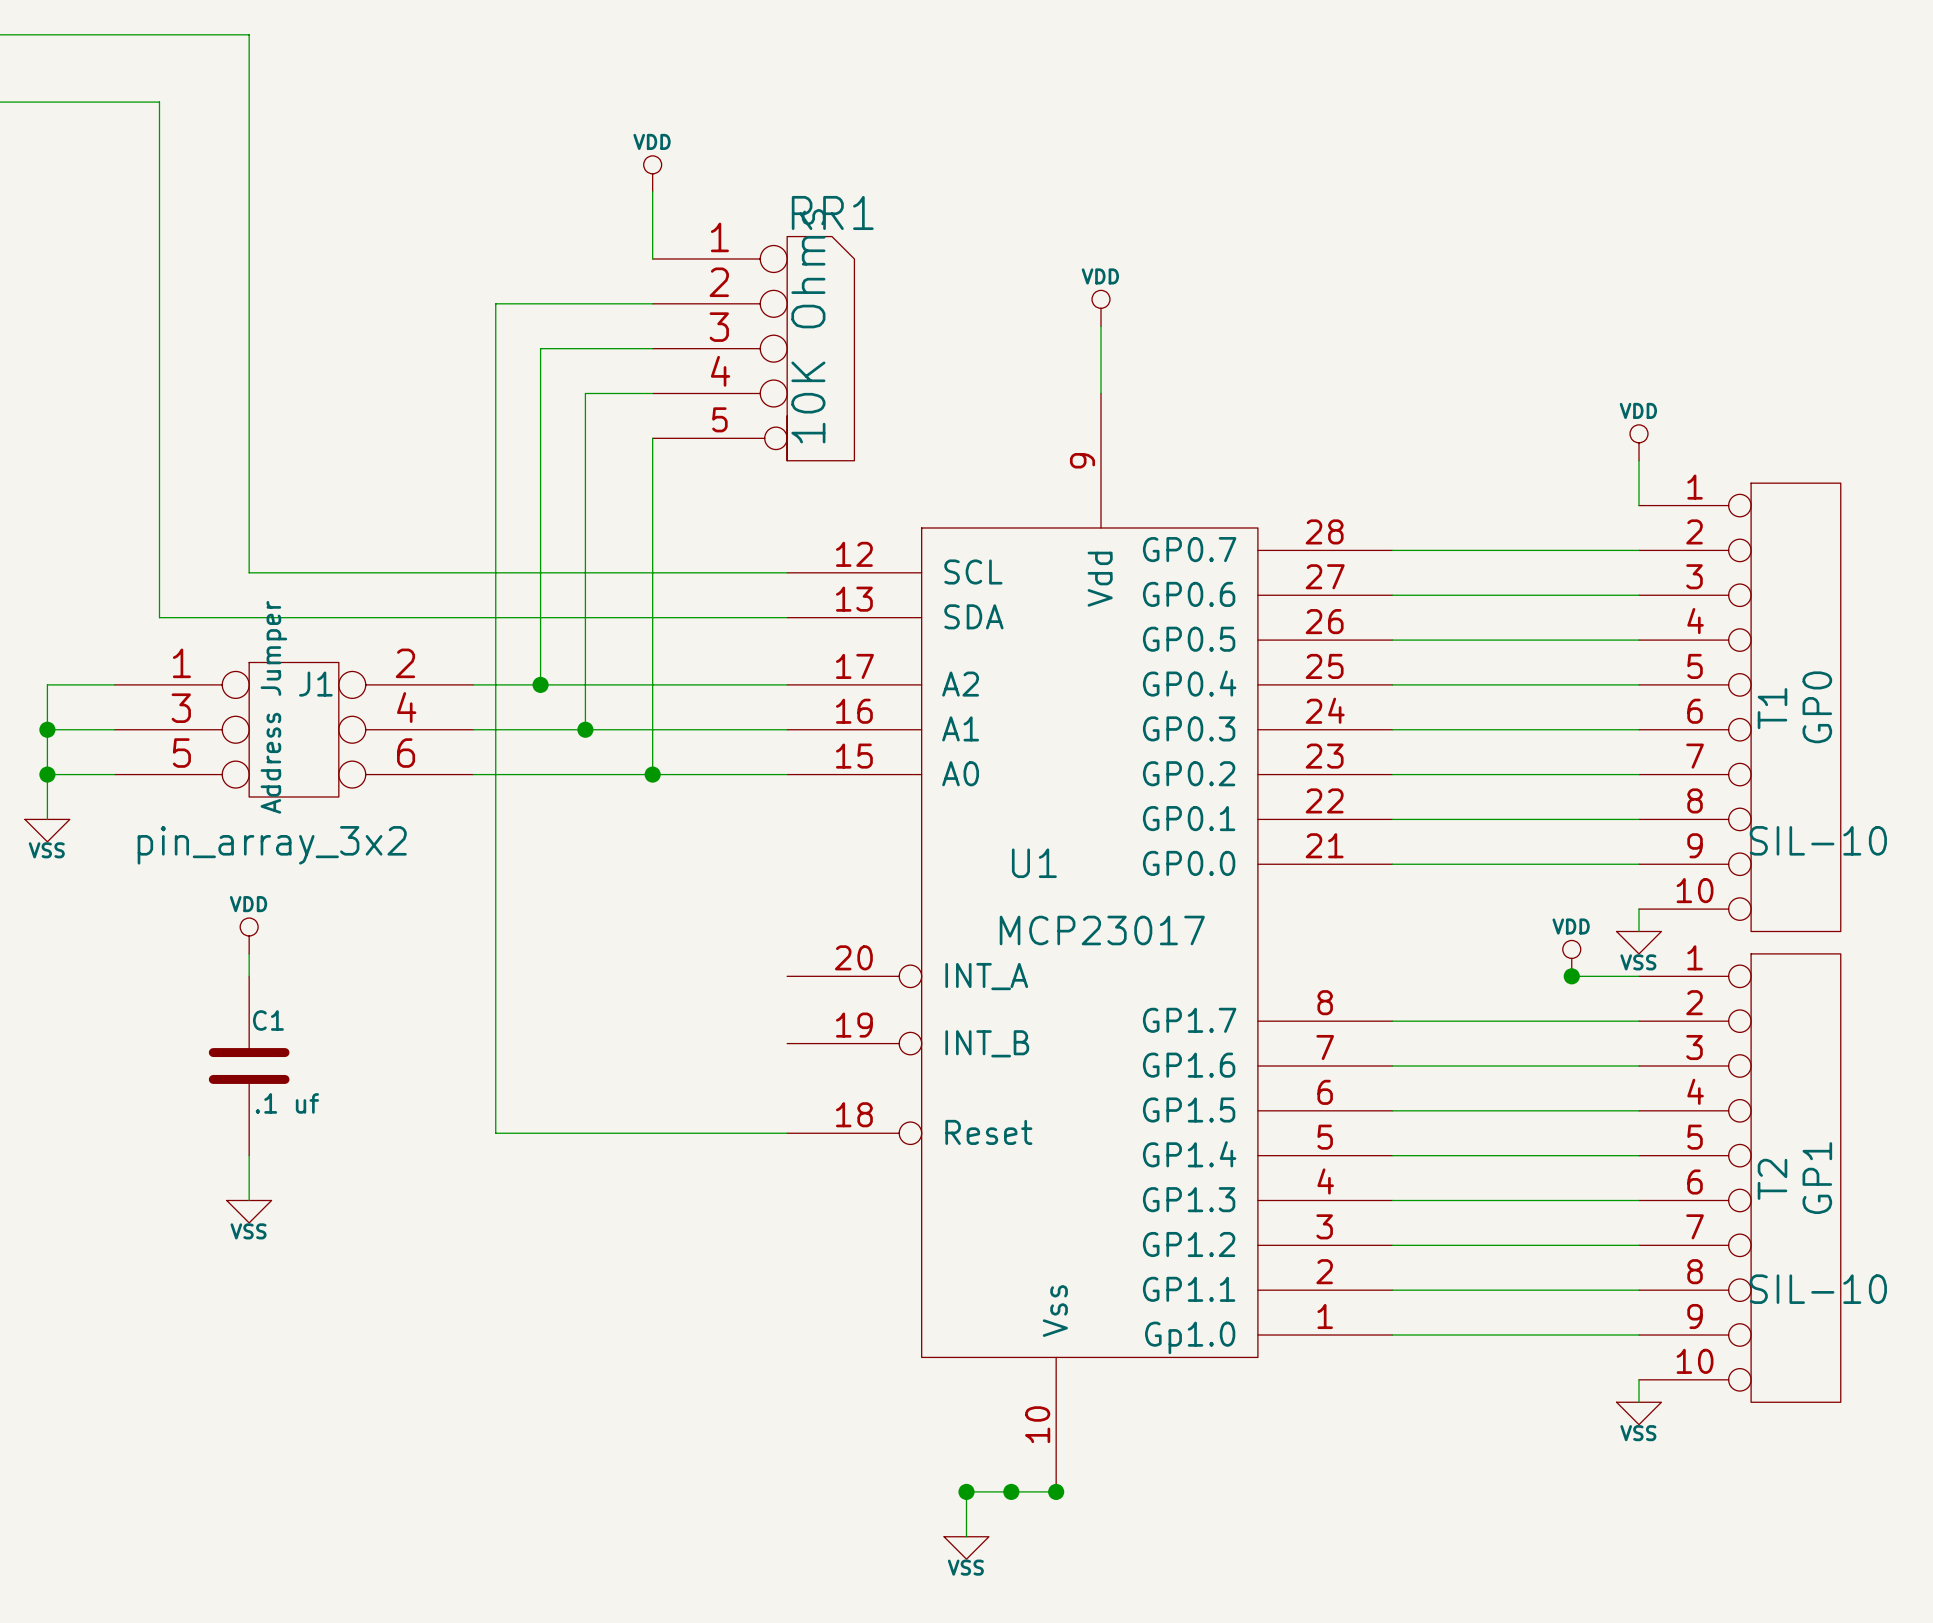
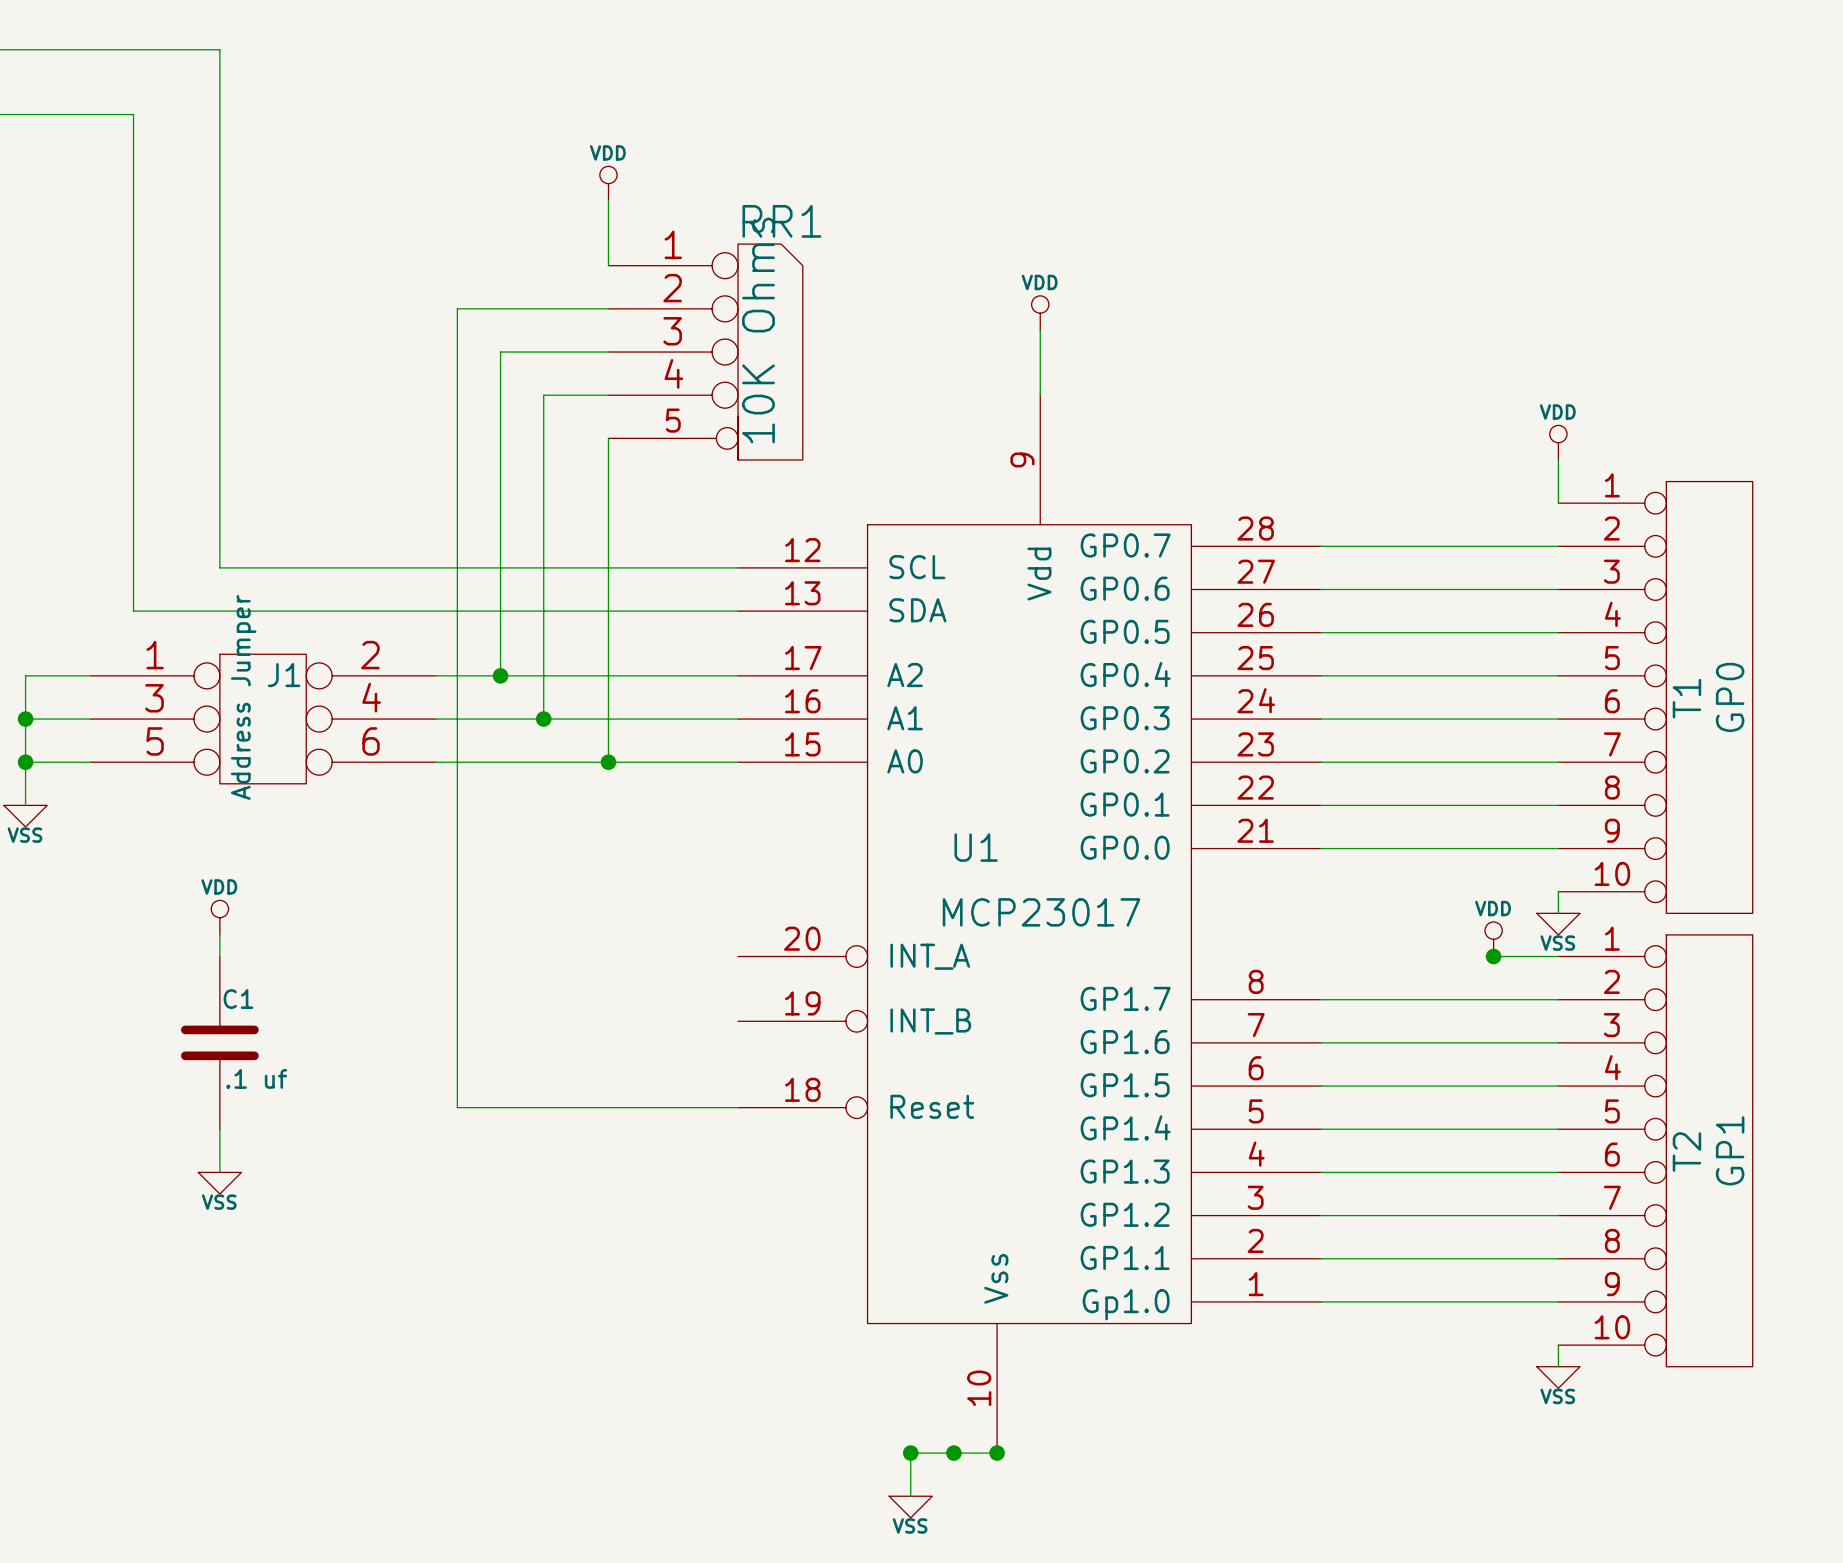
T1 text: SIL-10 (1818, 840) -> none
J1 text: pin_array_3x2 (272, 845) -> none
T2 text: SIL-10 (1818, 1289) -> none

